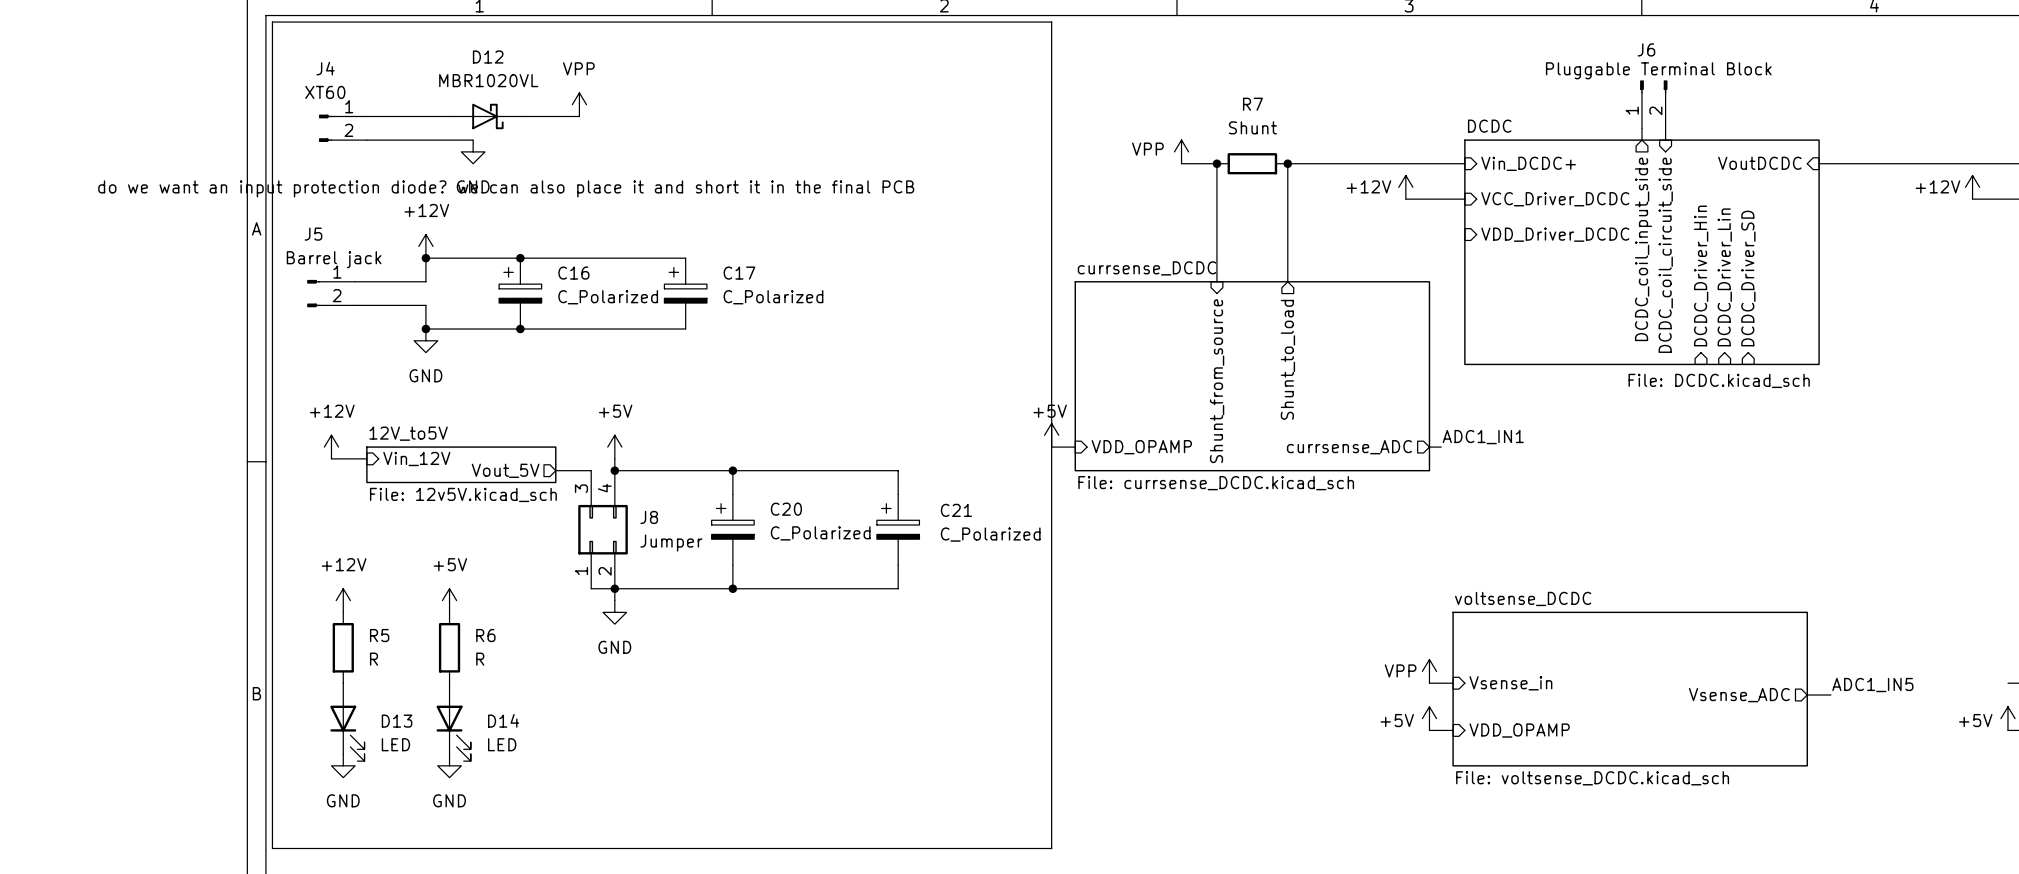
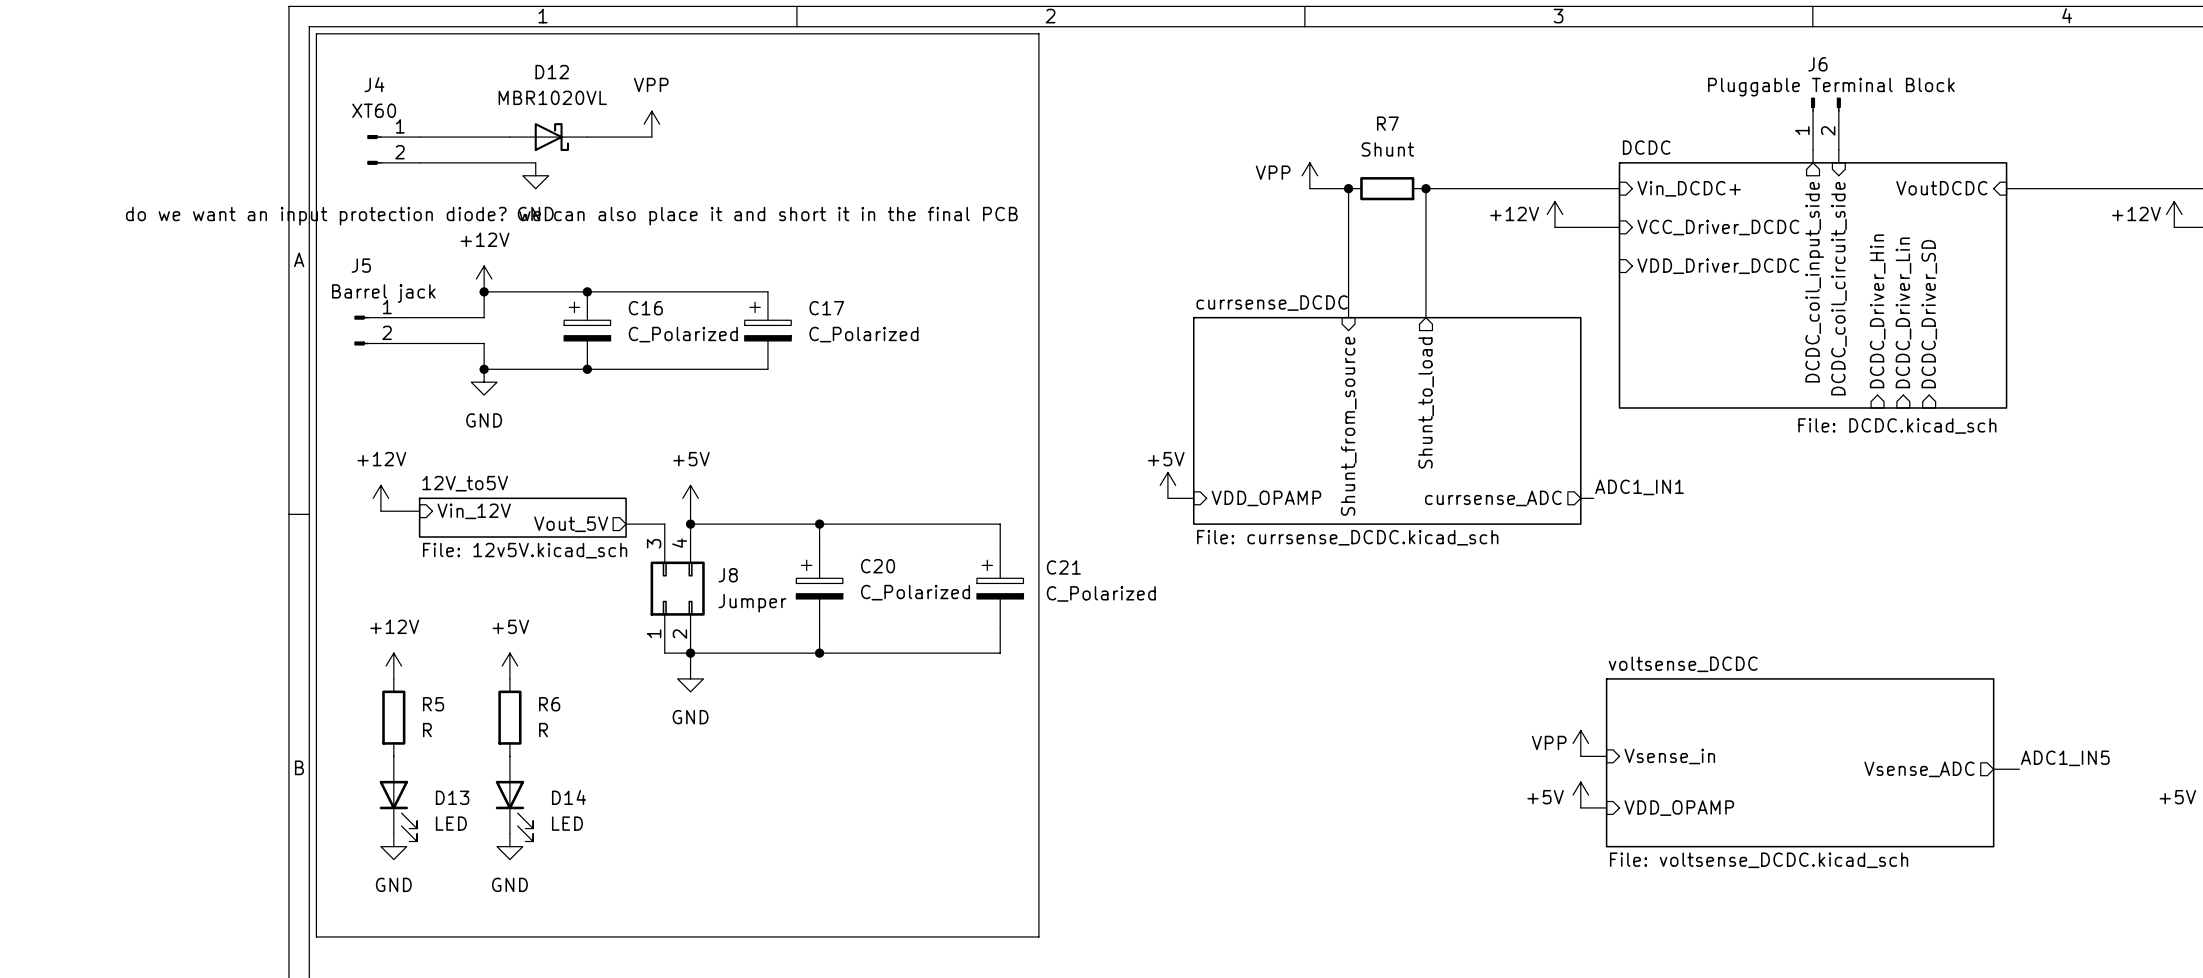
line: (933, 22) (1051, 22) (1051, 848) (933, 848) -> (1038, 33) (1038, 936)

